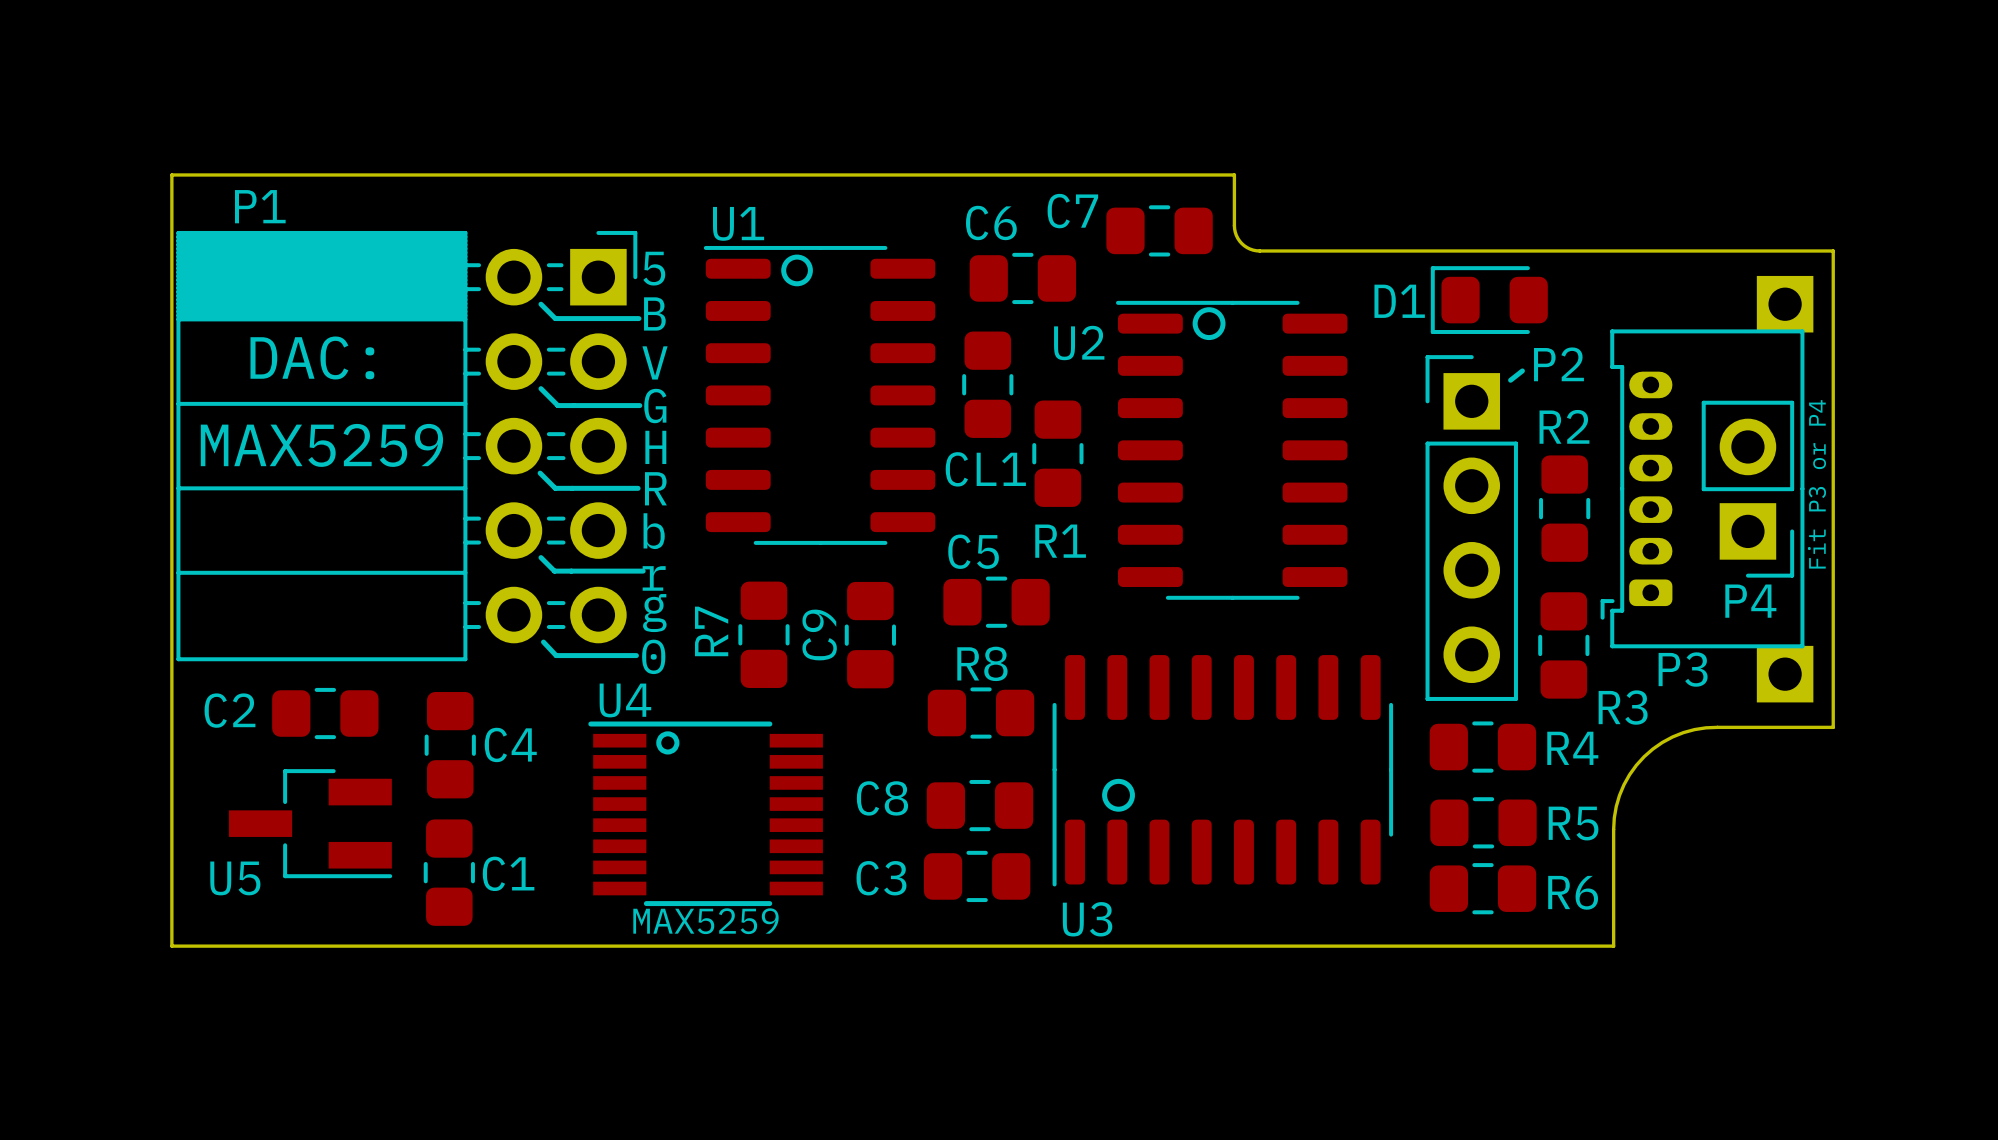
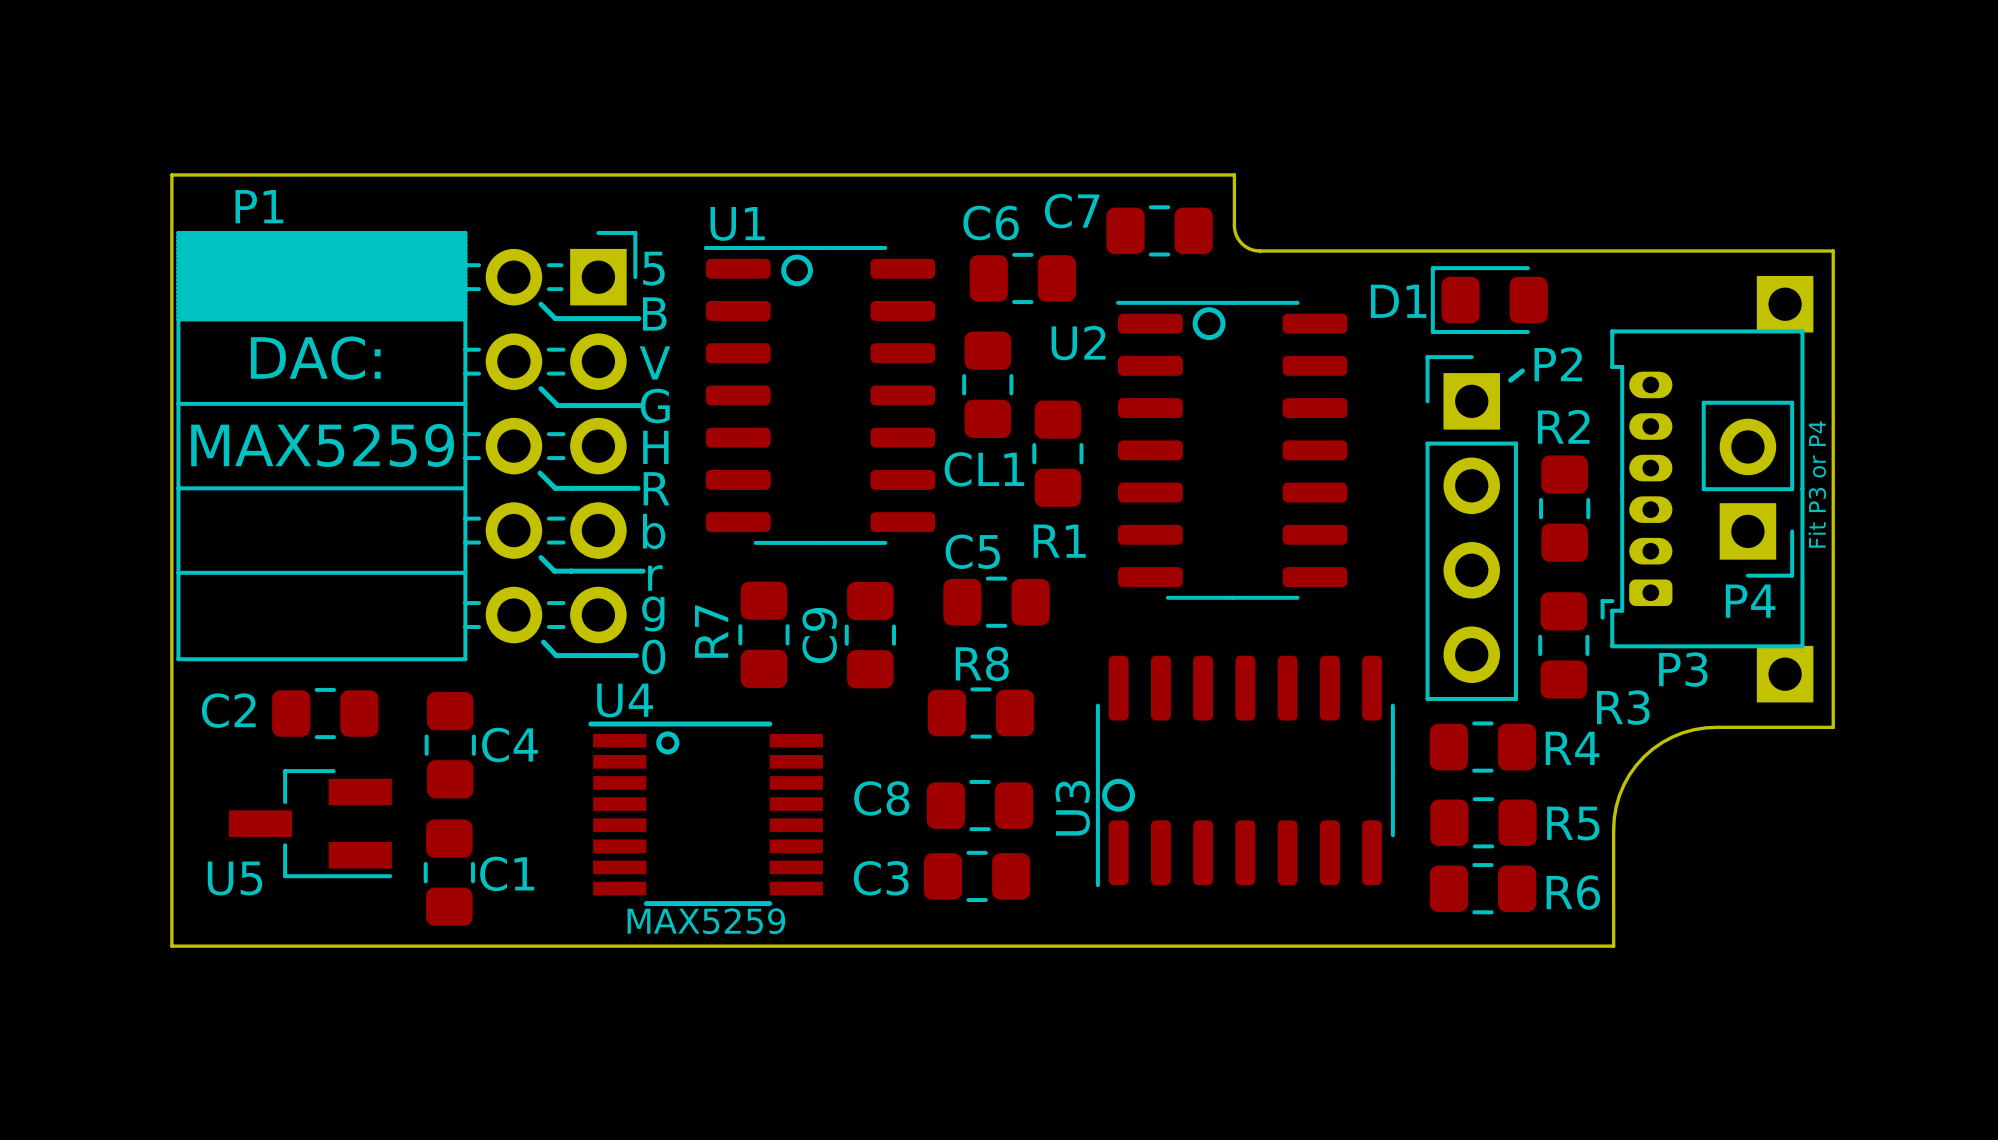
U3 footprint: [1052, 655, 1394, 887] -> [1095, 655, 1395, 888]
U3 name position: U3 (1087, 919) -> U3 (1072, 808)

